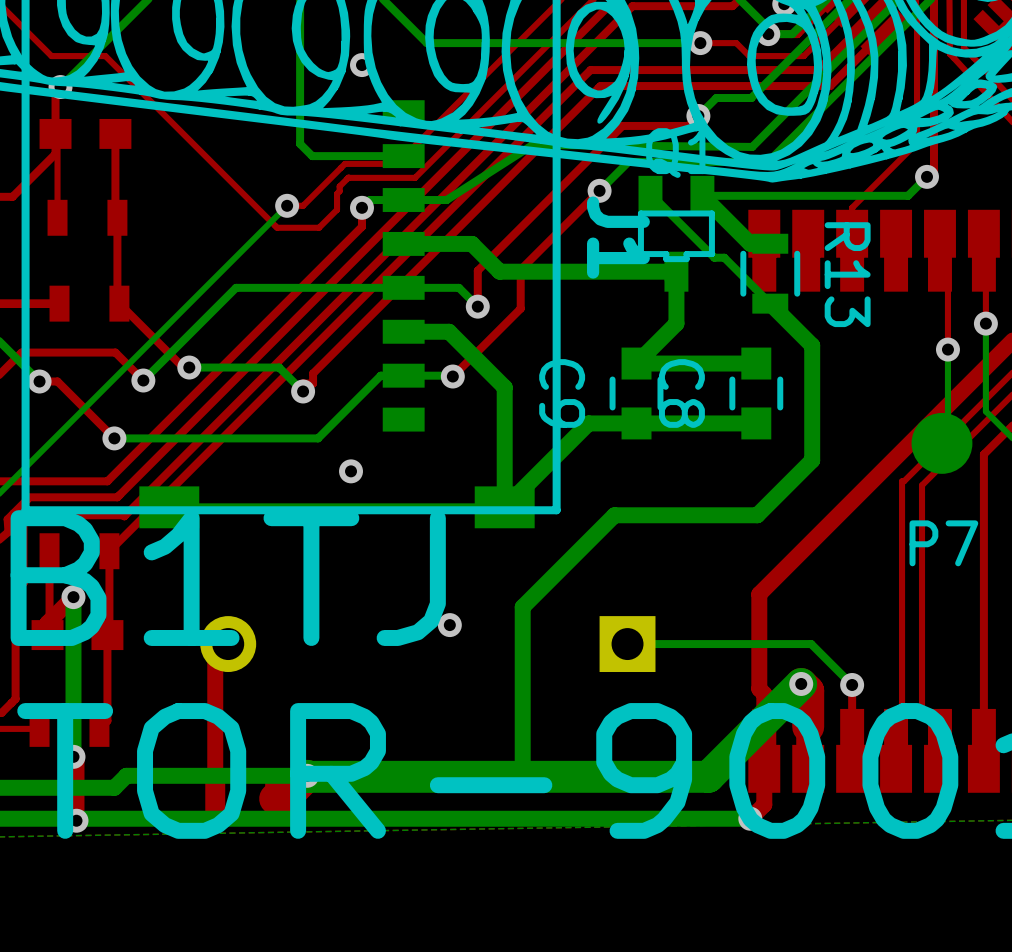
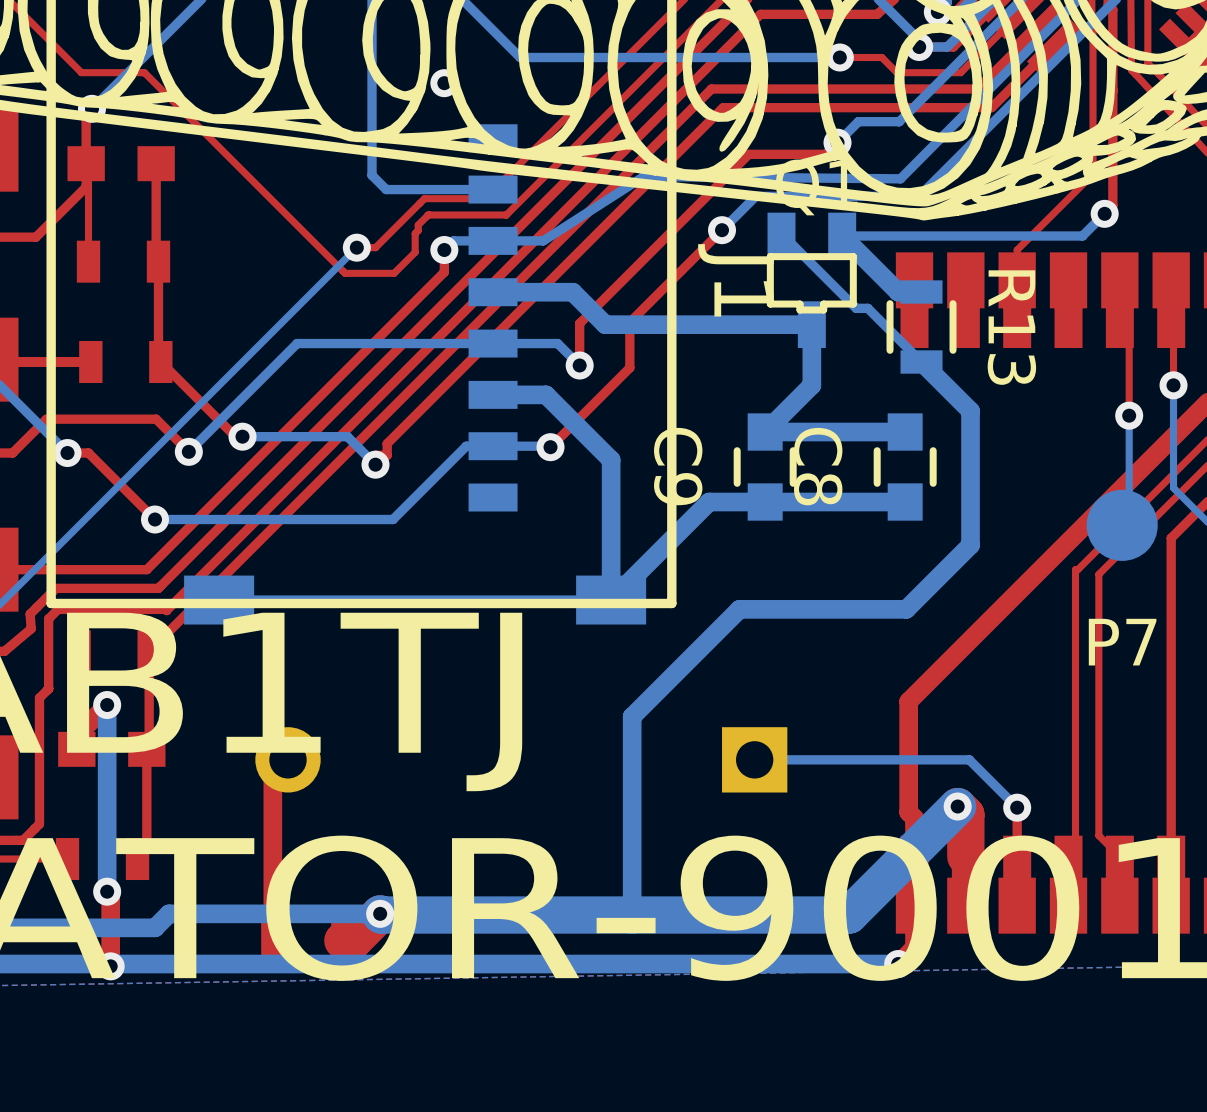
via: (351, 471) -> none
via: (449, 625) -> none

